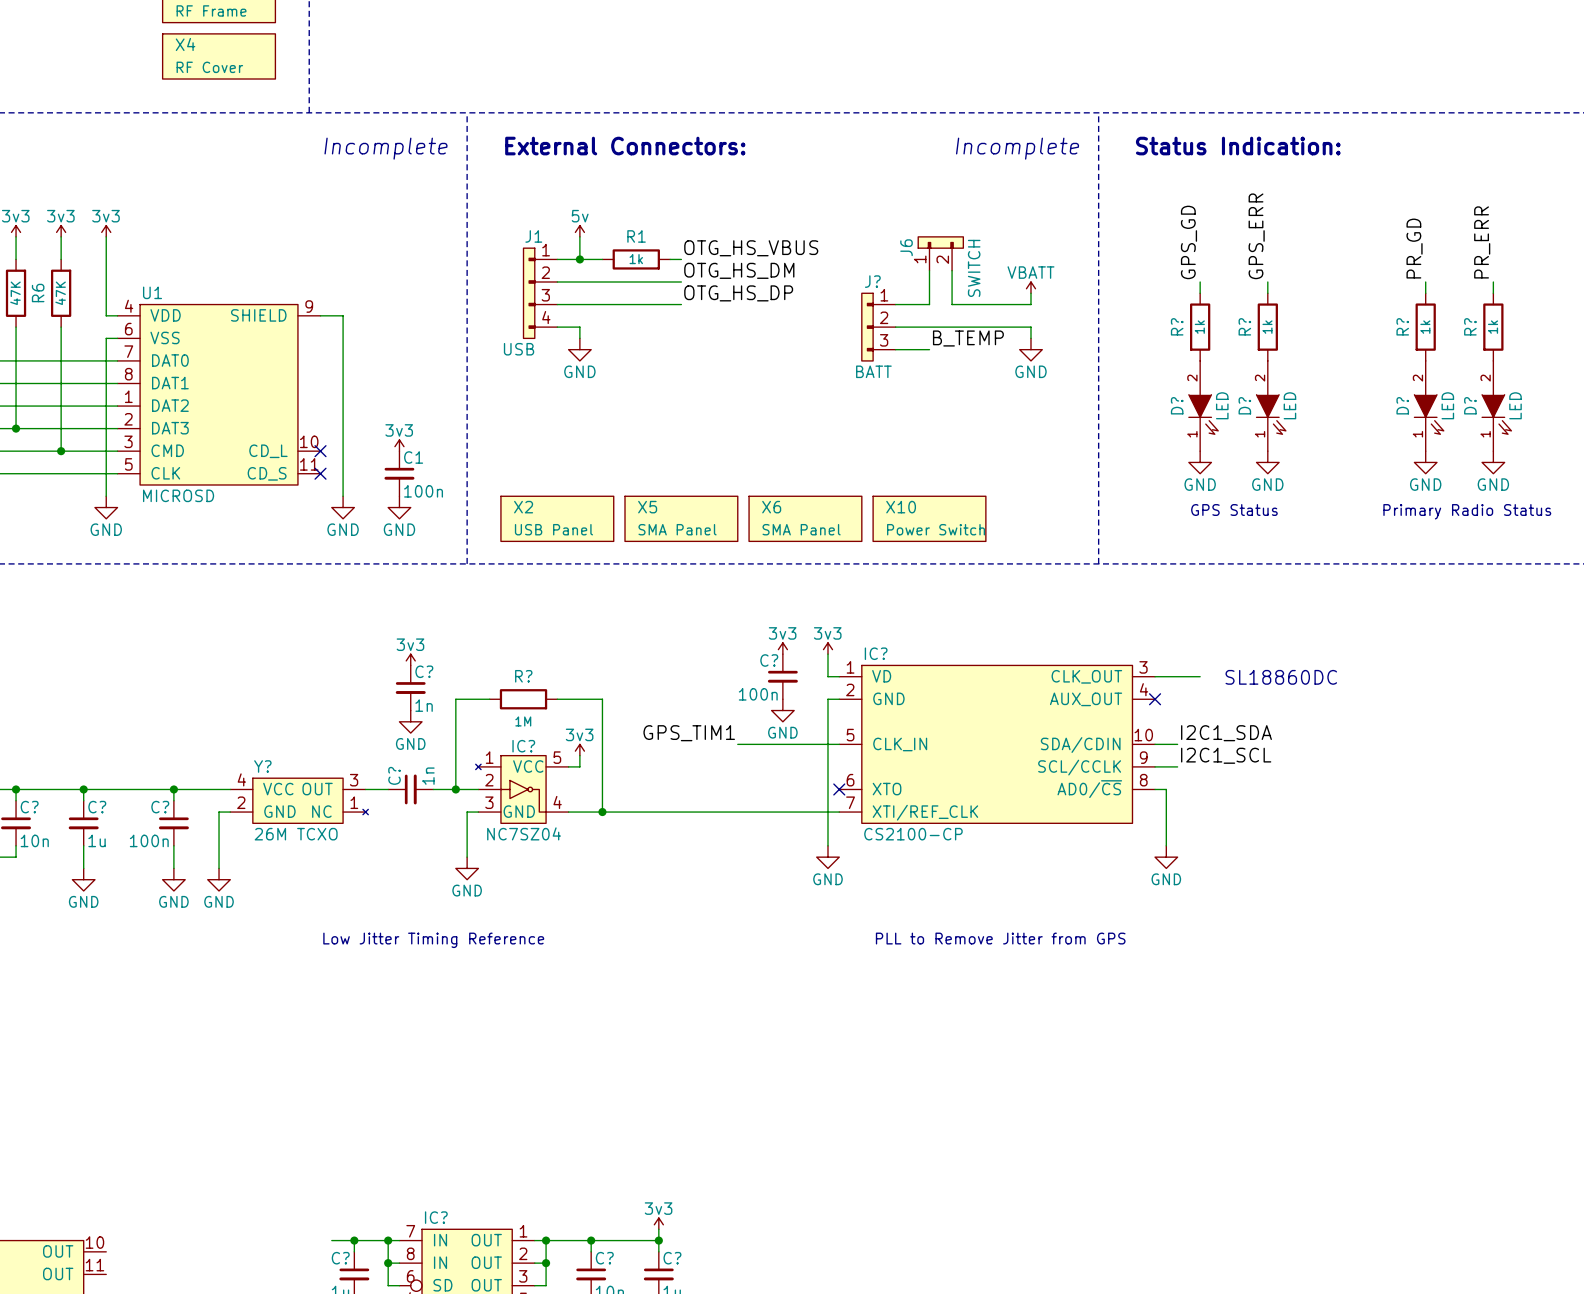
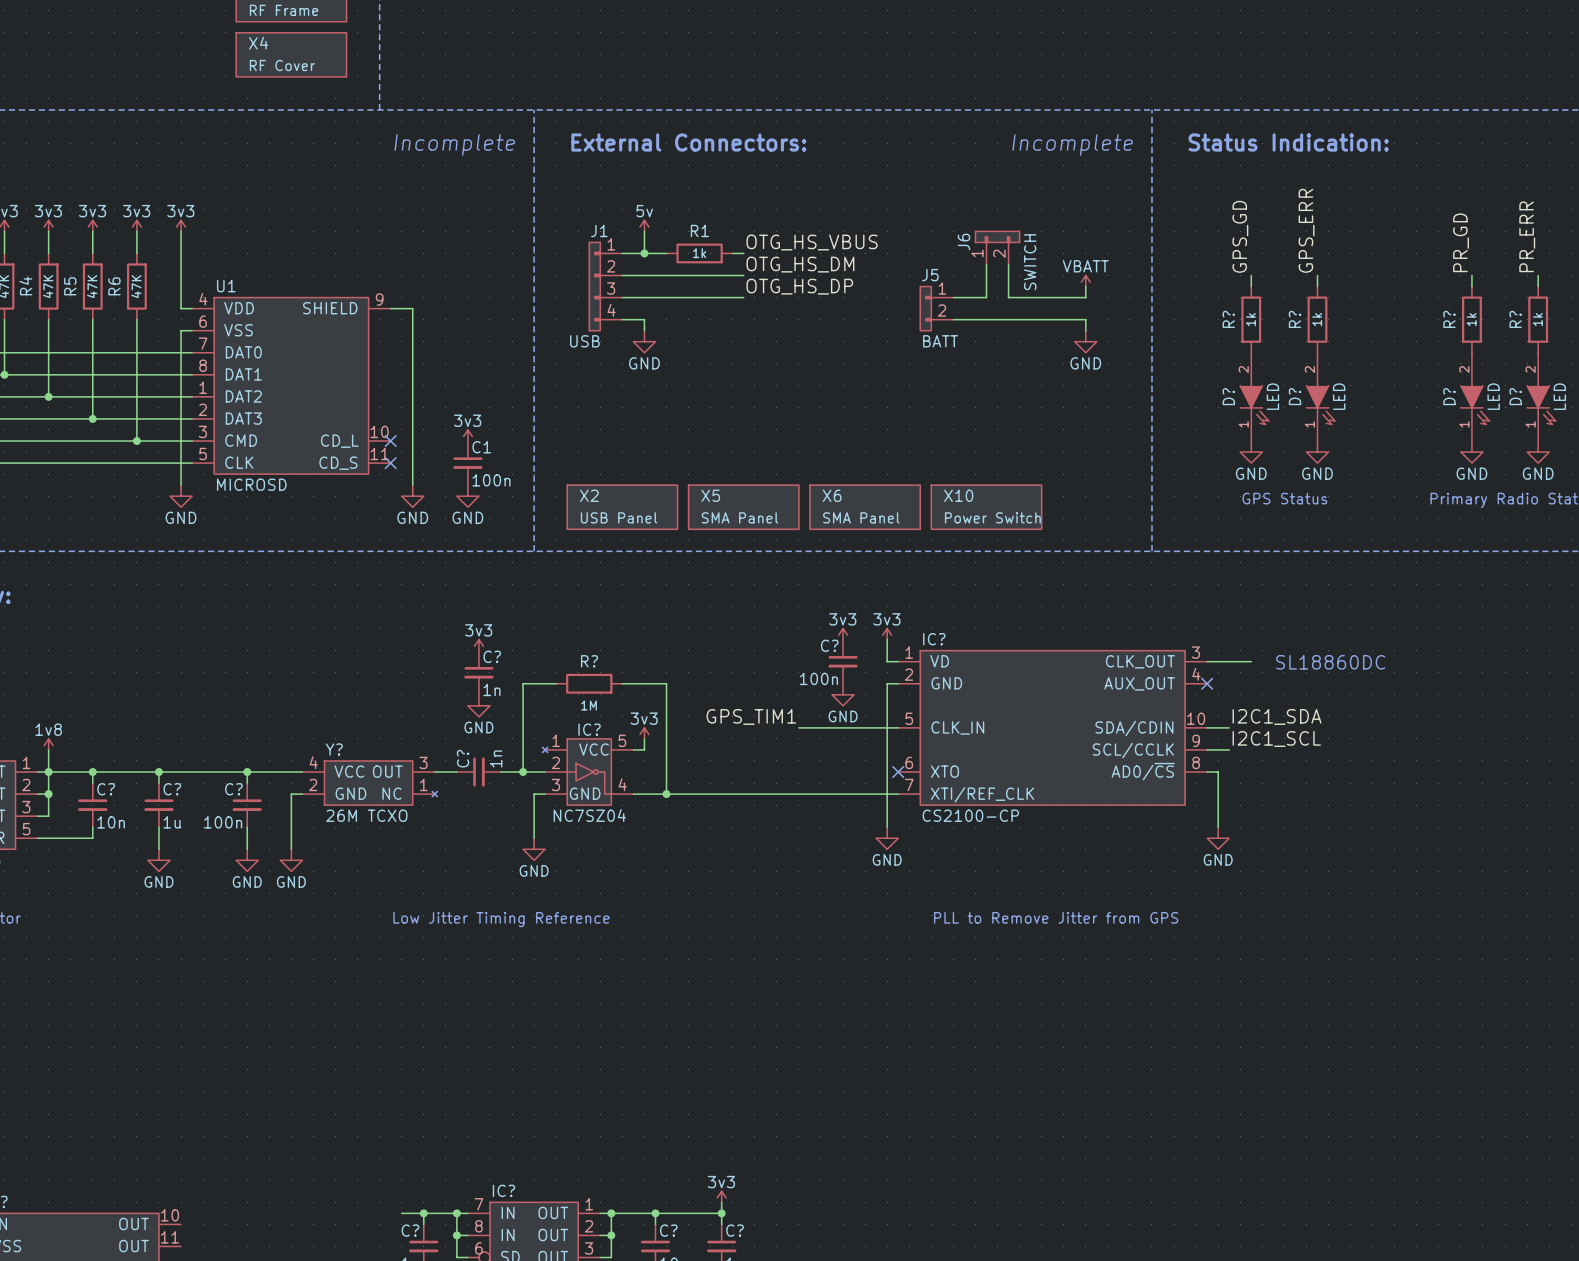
J5: none -> BATT (936, 308)
J?: BATT (878, 327) -> none
label: B_TEMP (968, 338) -> none
wire: (895, 349) (929, 349) -> none

